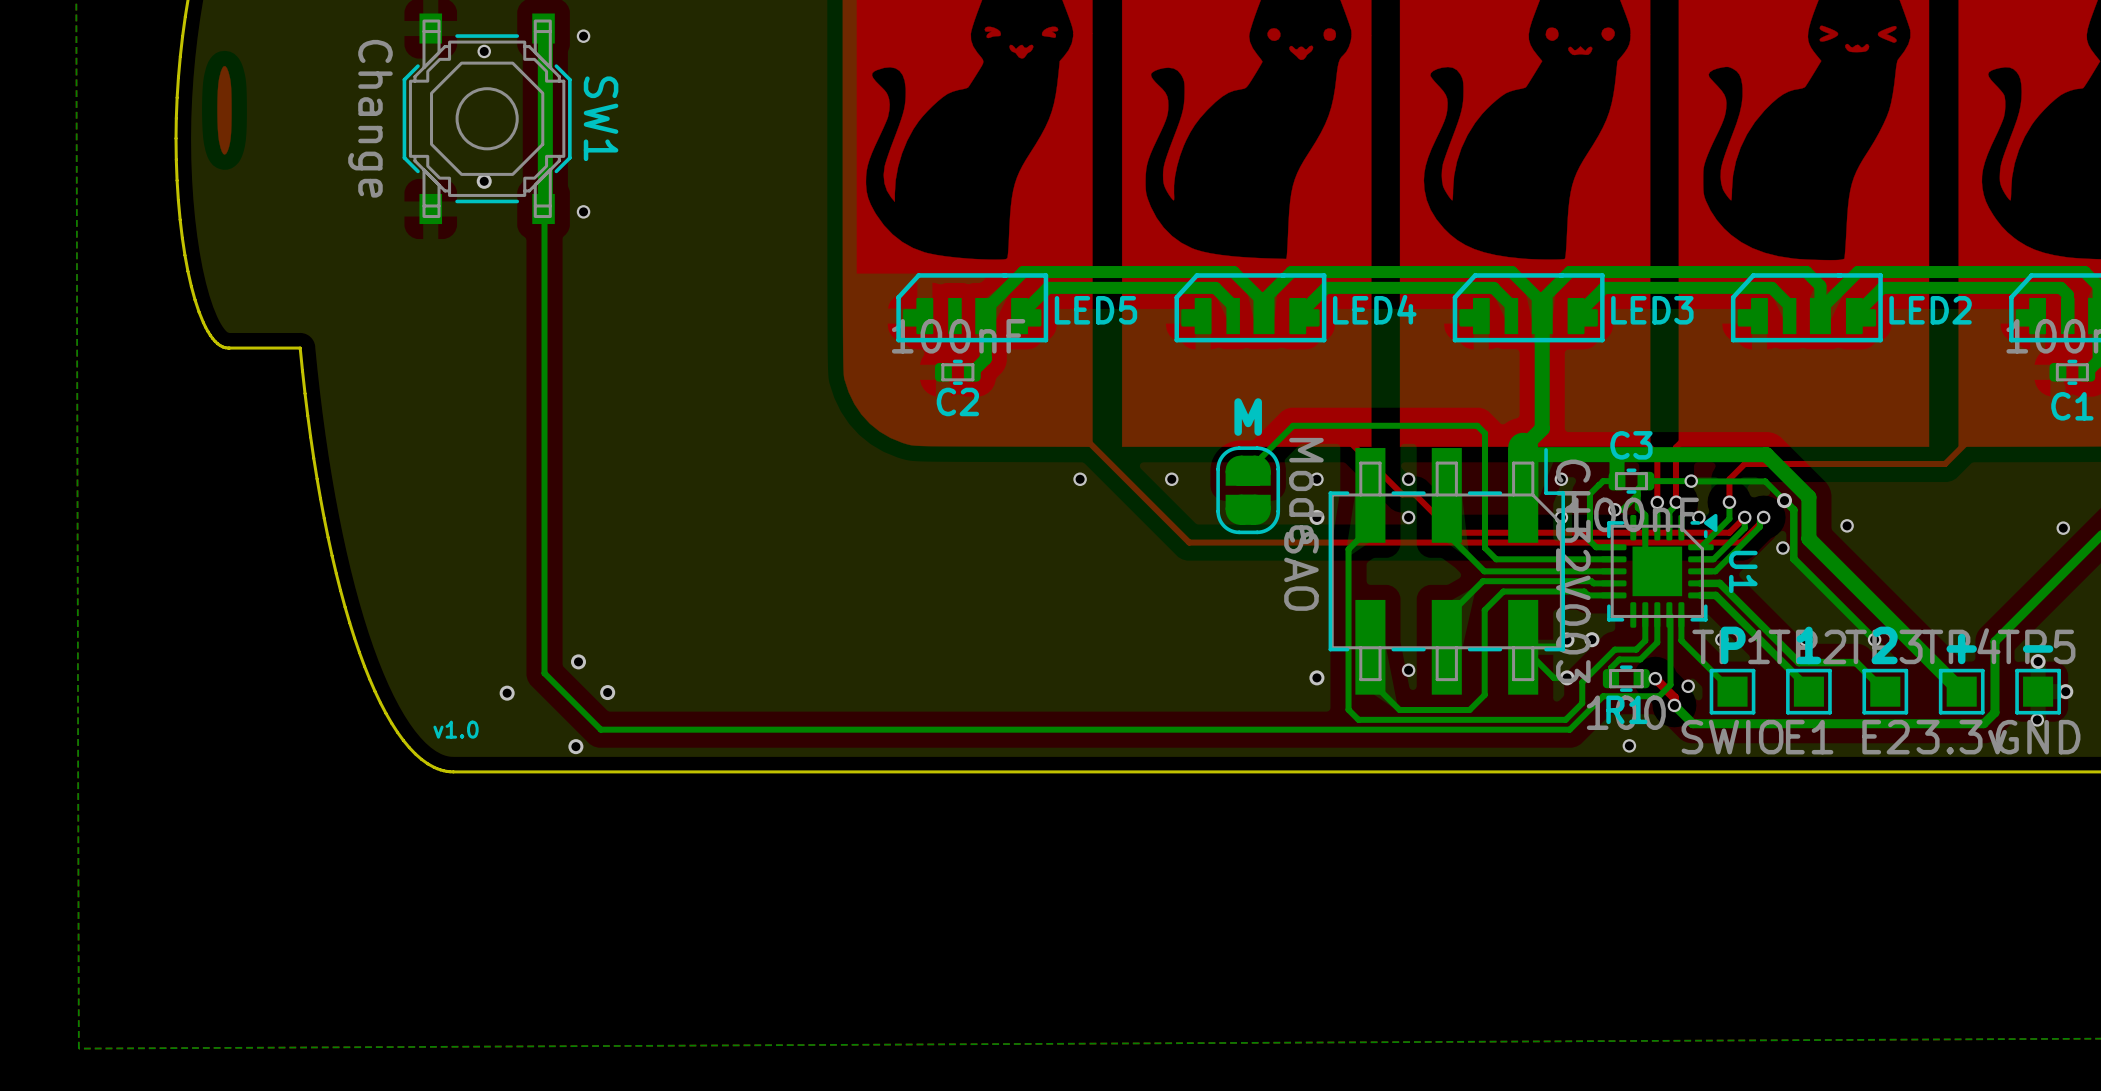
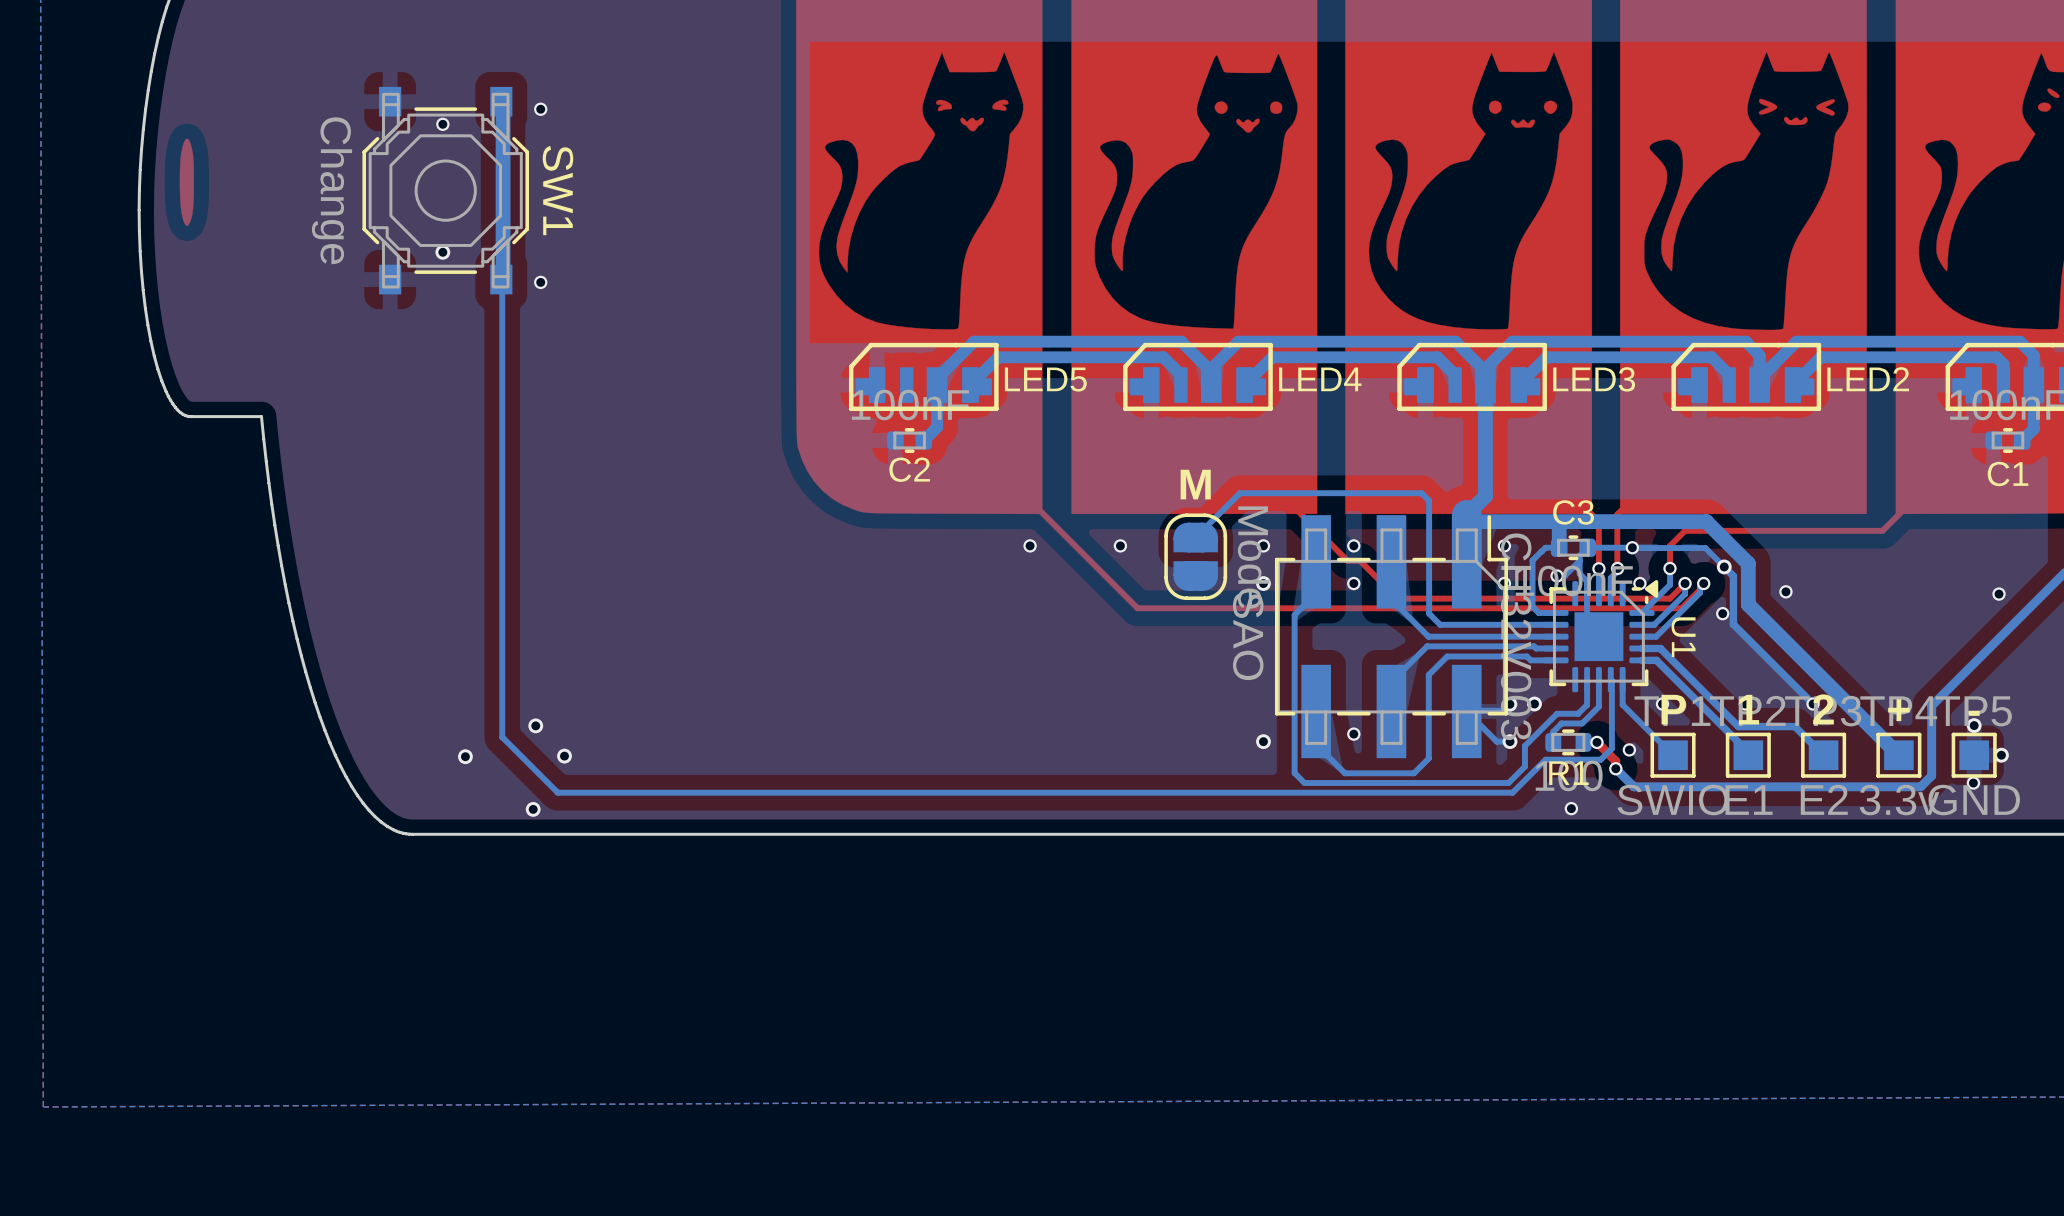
text: v1.0 (456, 729) -> none

